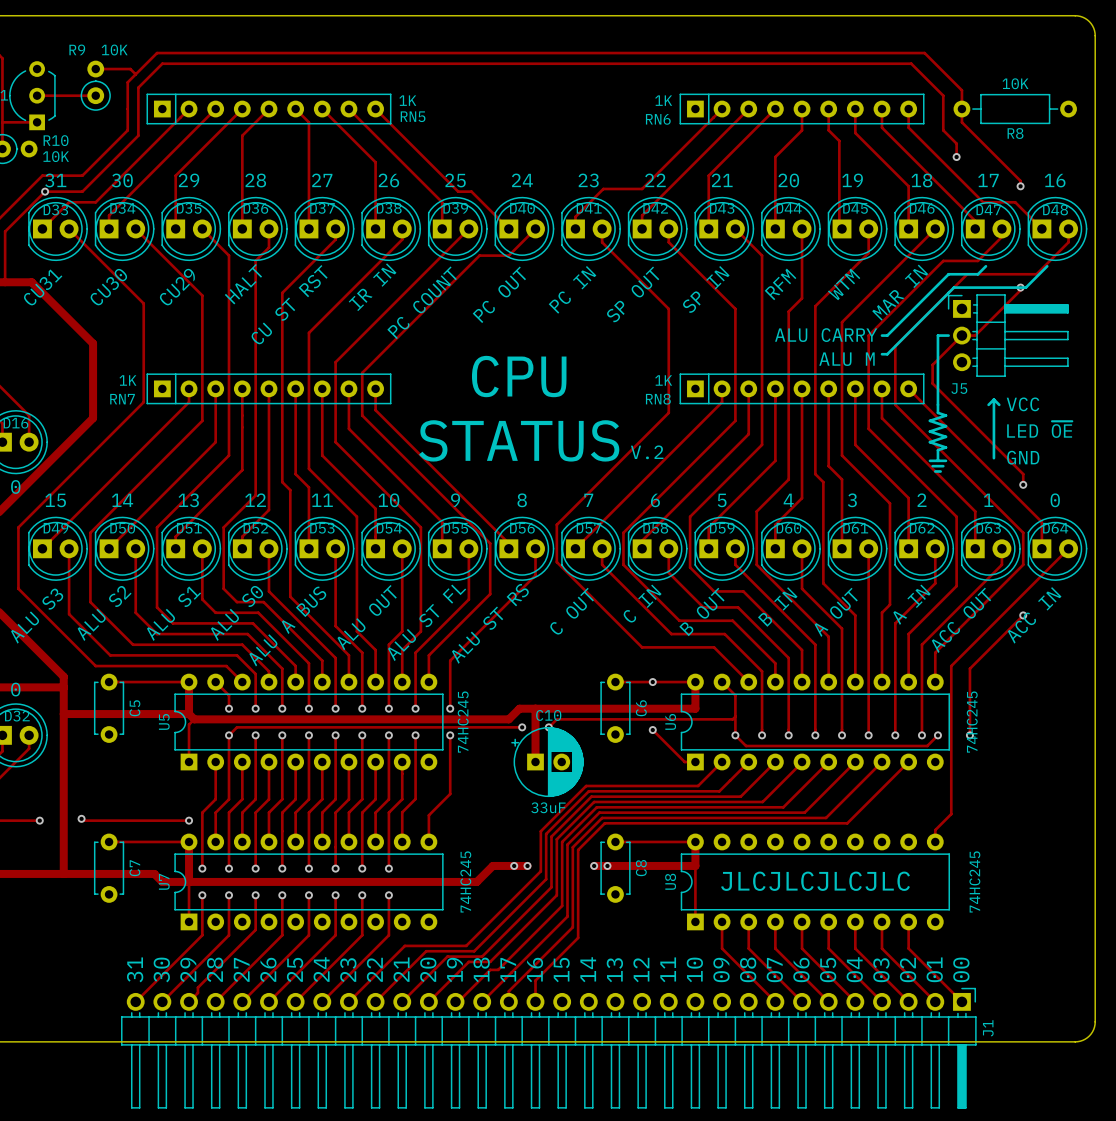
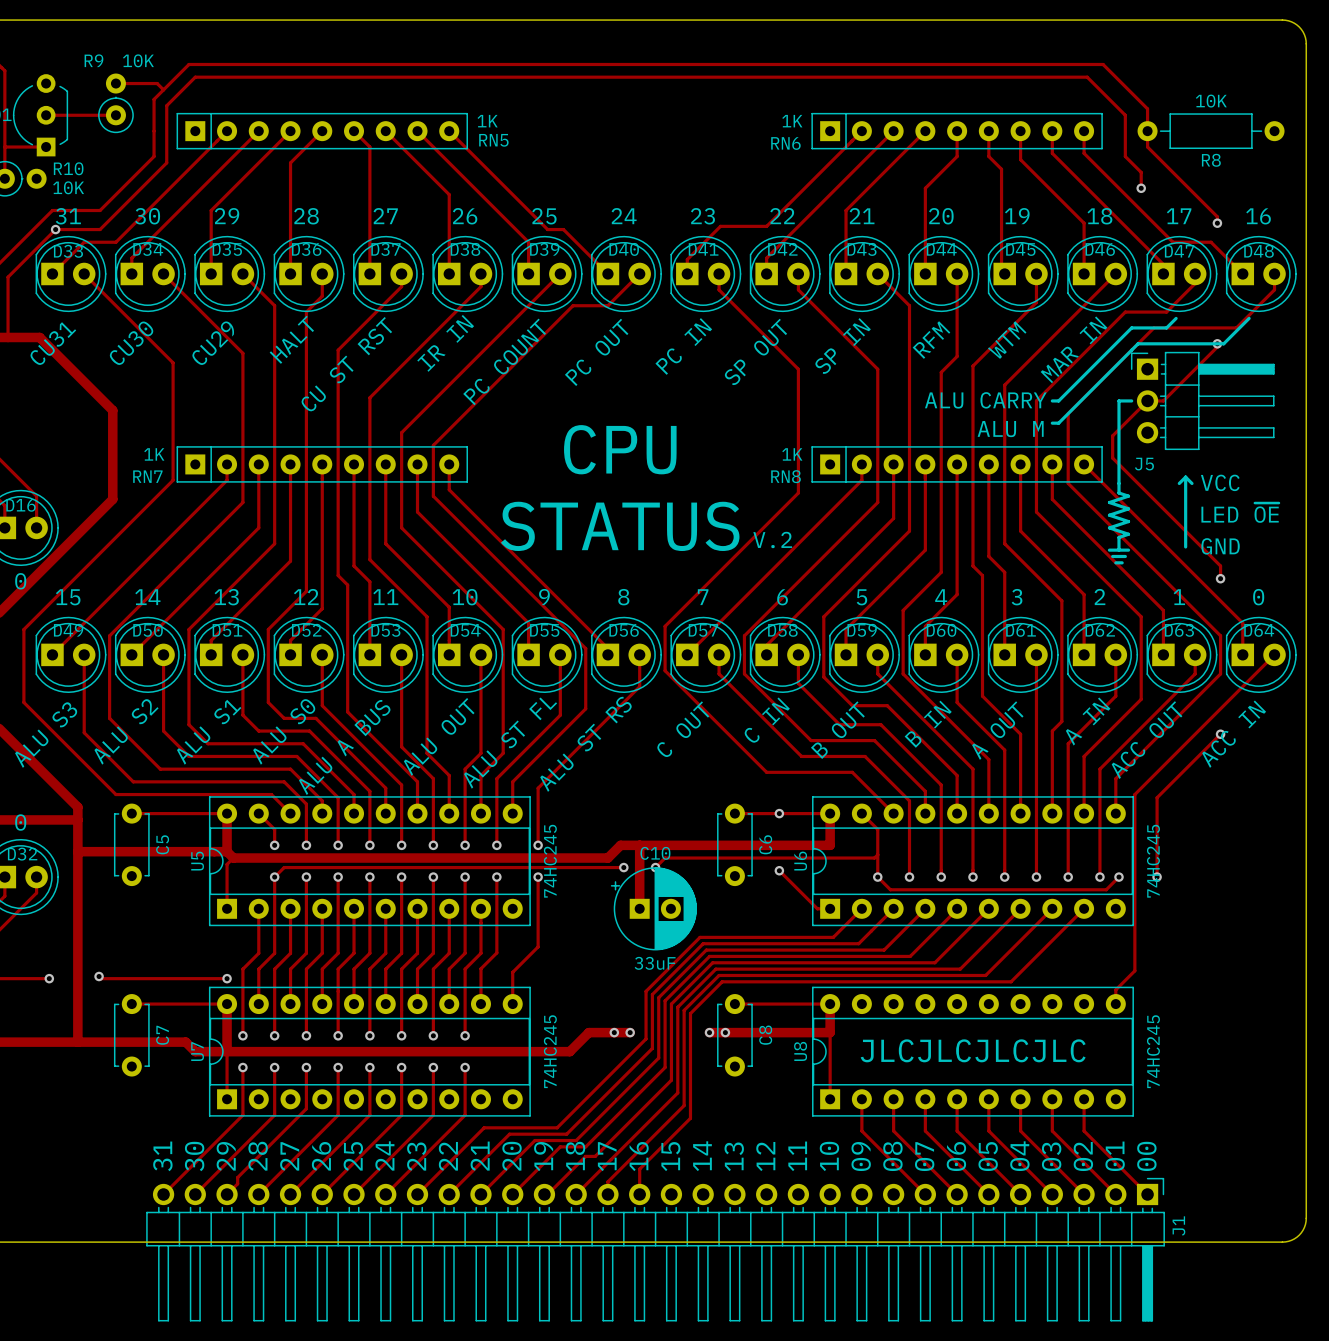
U5 footprint: [174, 673, 444, 771] -> [208, 796, 531, 927]
U6 footprint: [680, 673, 950, 771] -> [812, 796, 1134, 927]
U7 footprint: [174, 833, 444, 931] -> [208, 986, 531, 1117]
U8 footprint: [680, 833, 950, 931] -> [812, 986, 1134, 1117]

